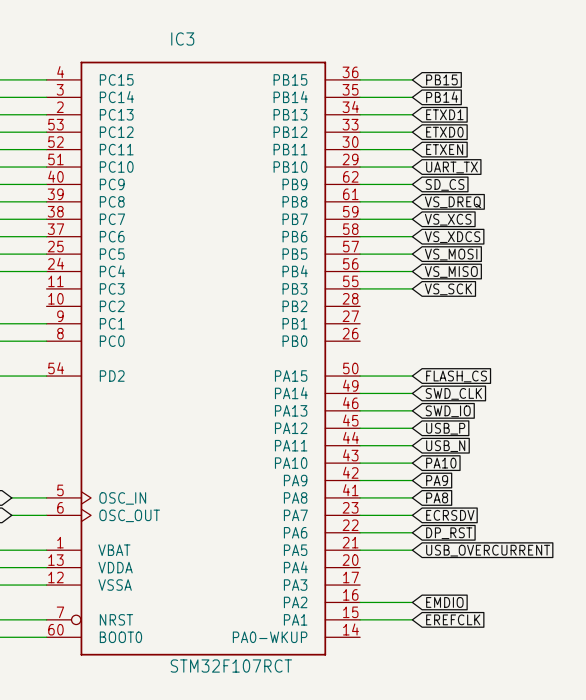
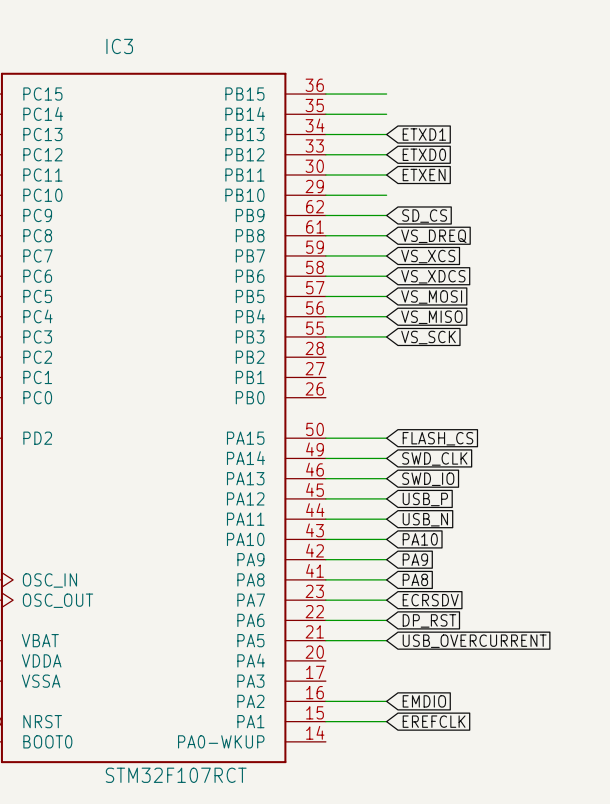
global label: PB15 (441, 79) -> none
global label: PB14 (442, 97) -> none
global label: UART_TX (451, 167) -> none

